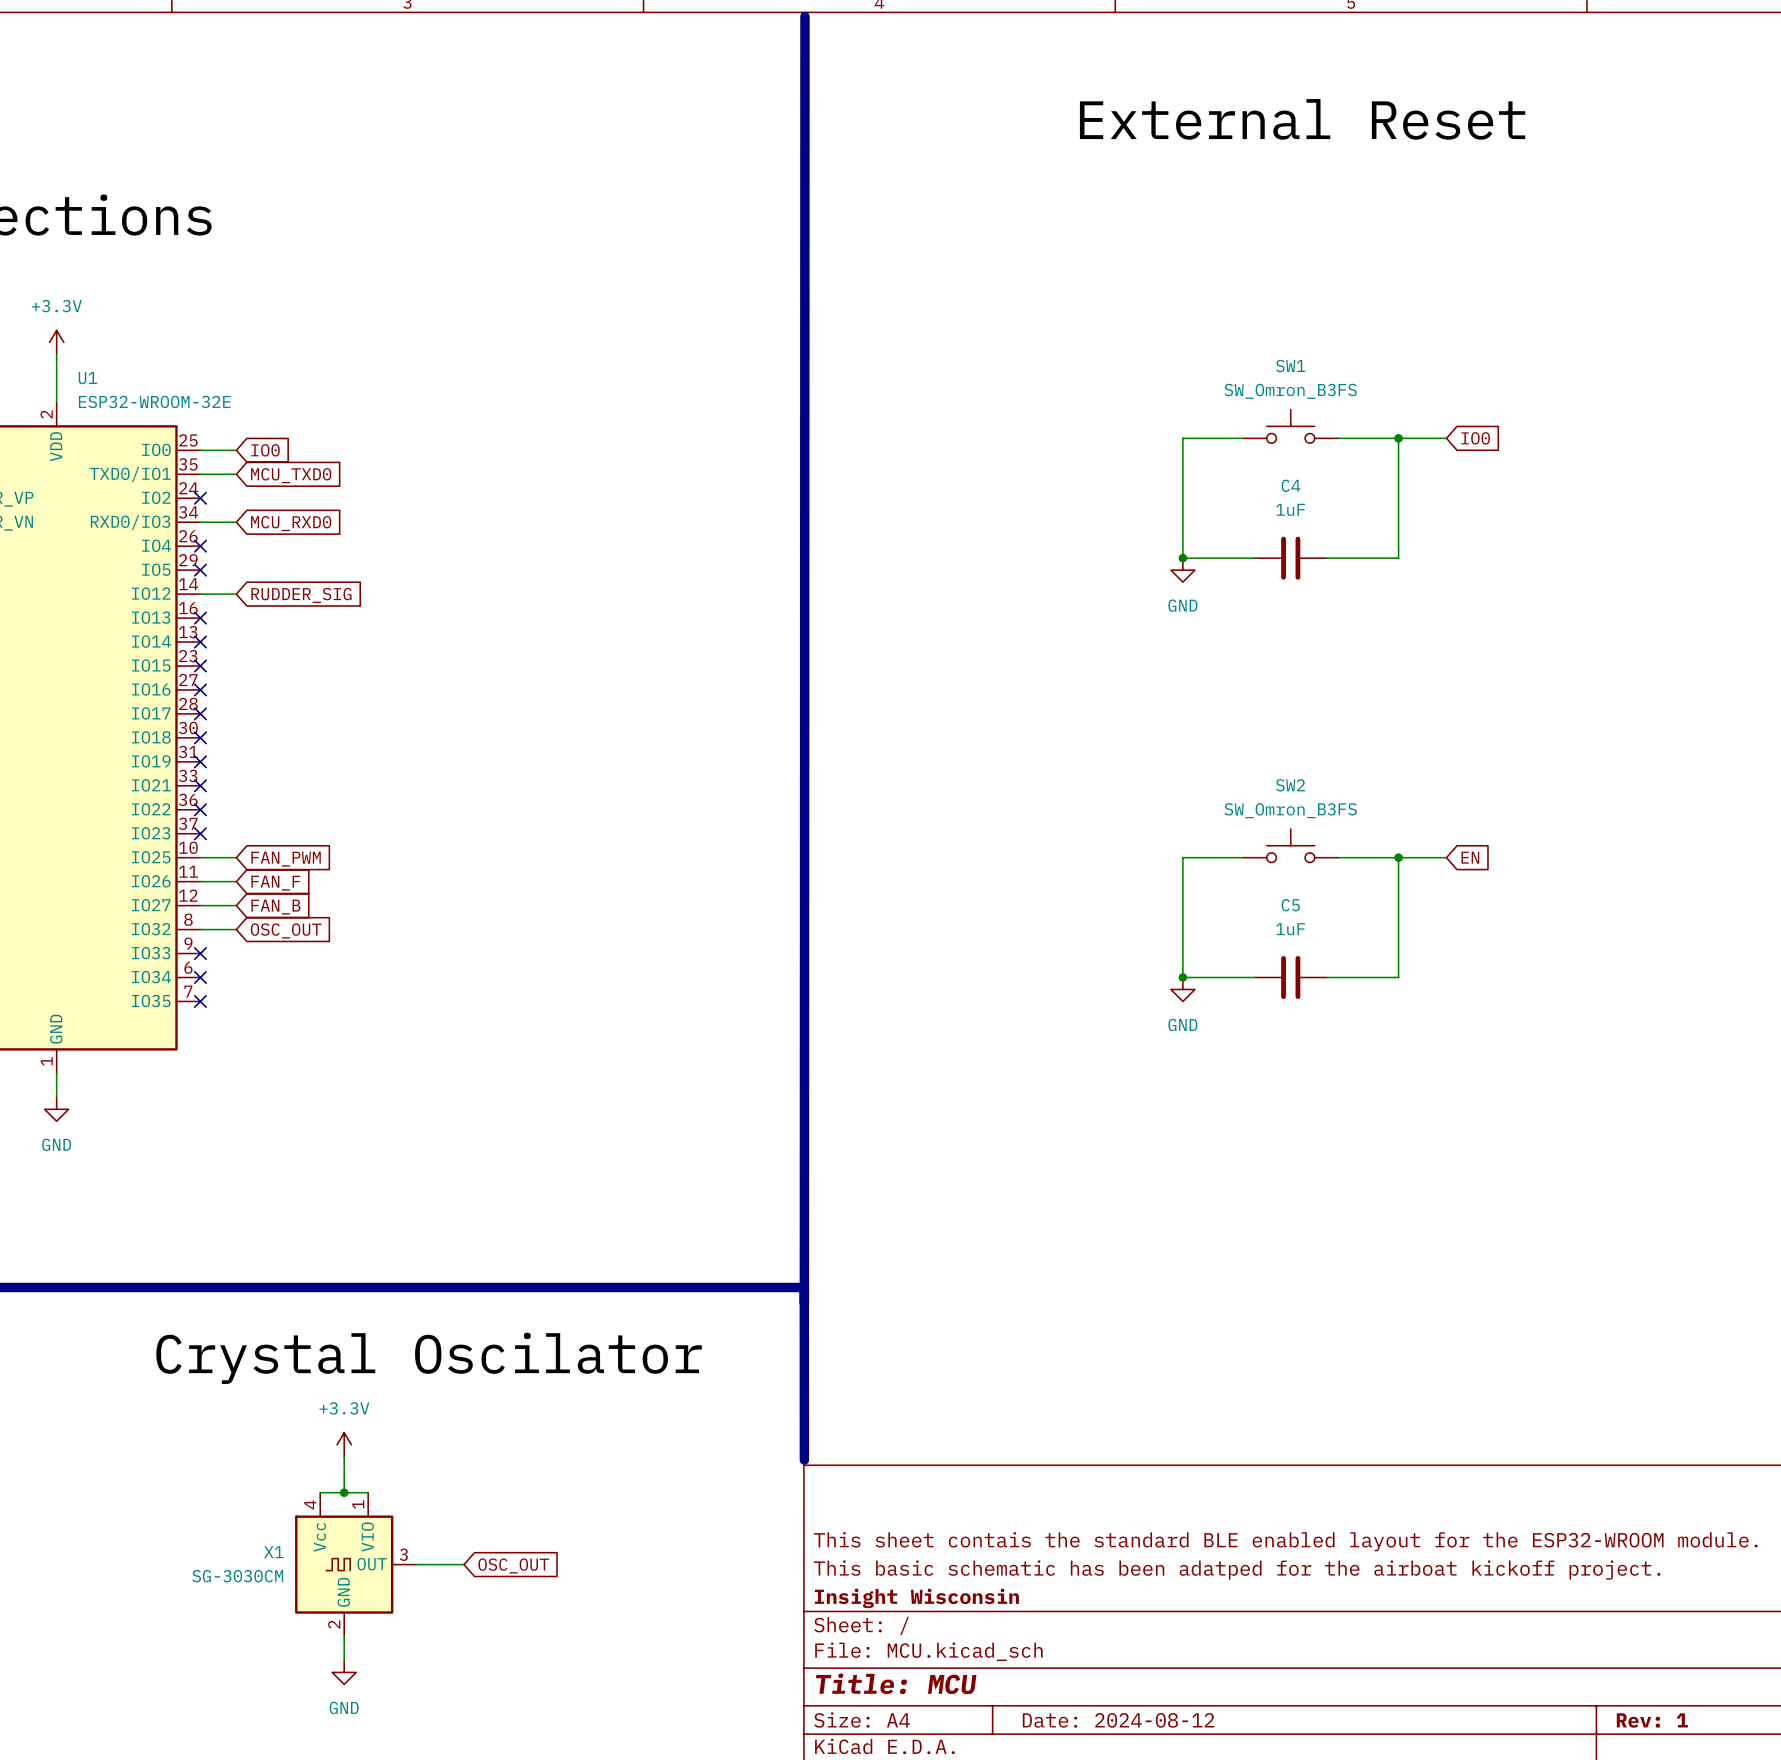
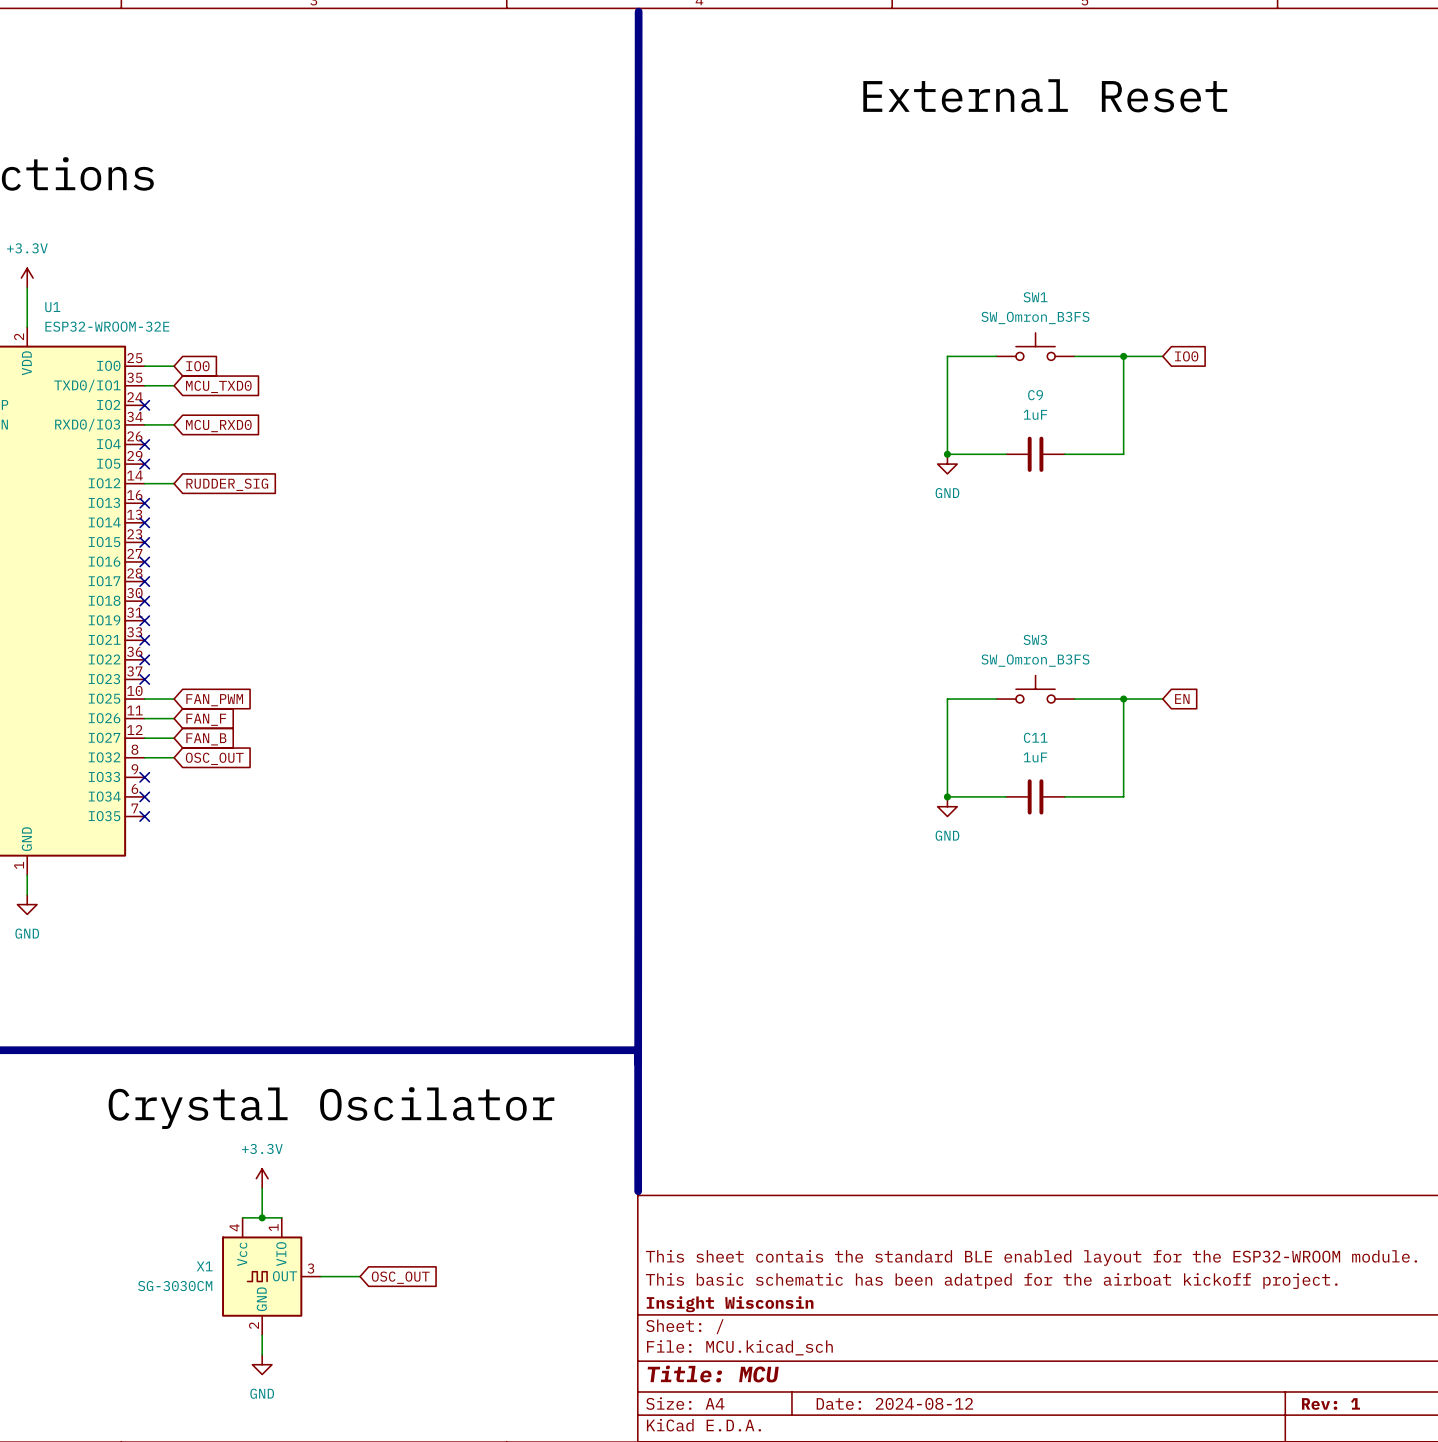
C4 name: C4 (1291, 485) -> C9 (1035, 395)
SW2 name: SW2 (1290, 785) -> SW3 (1035, 639)
C5 name: C5 (1290, 905) -> C11 (1035, 737)

